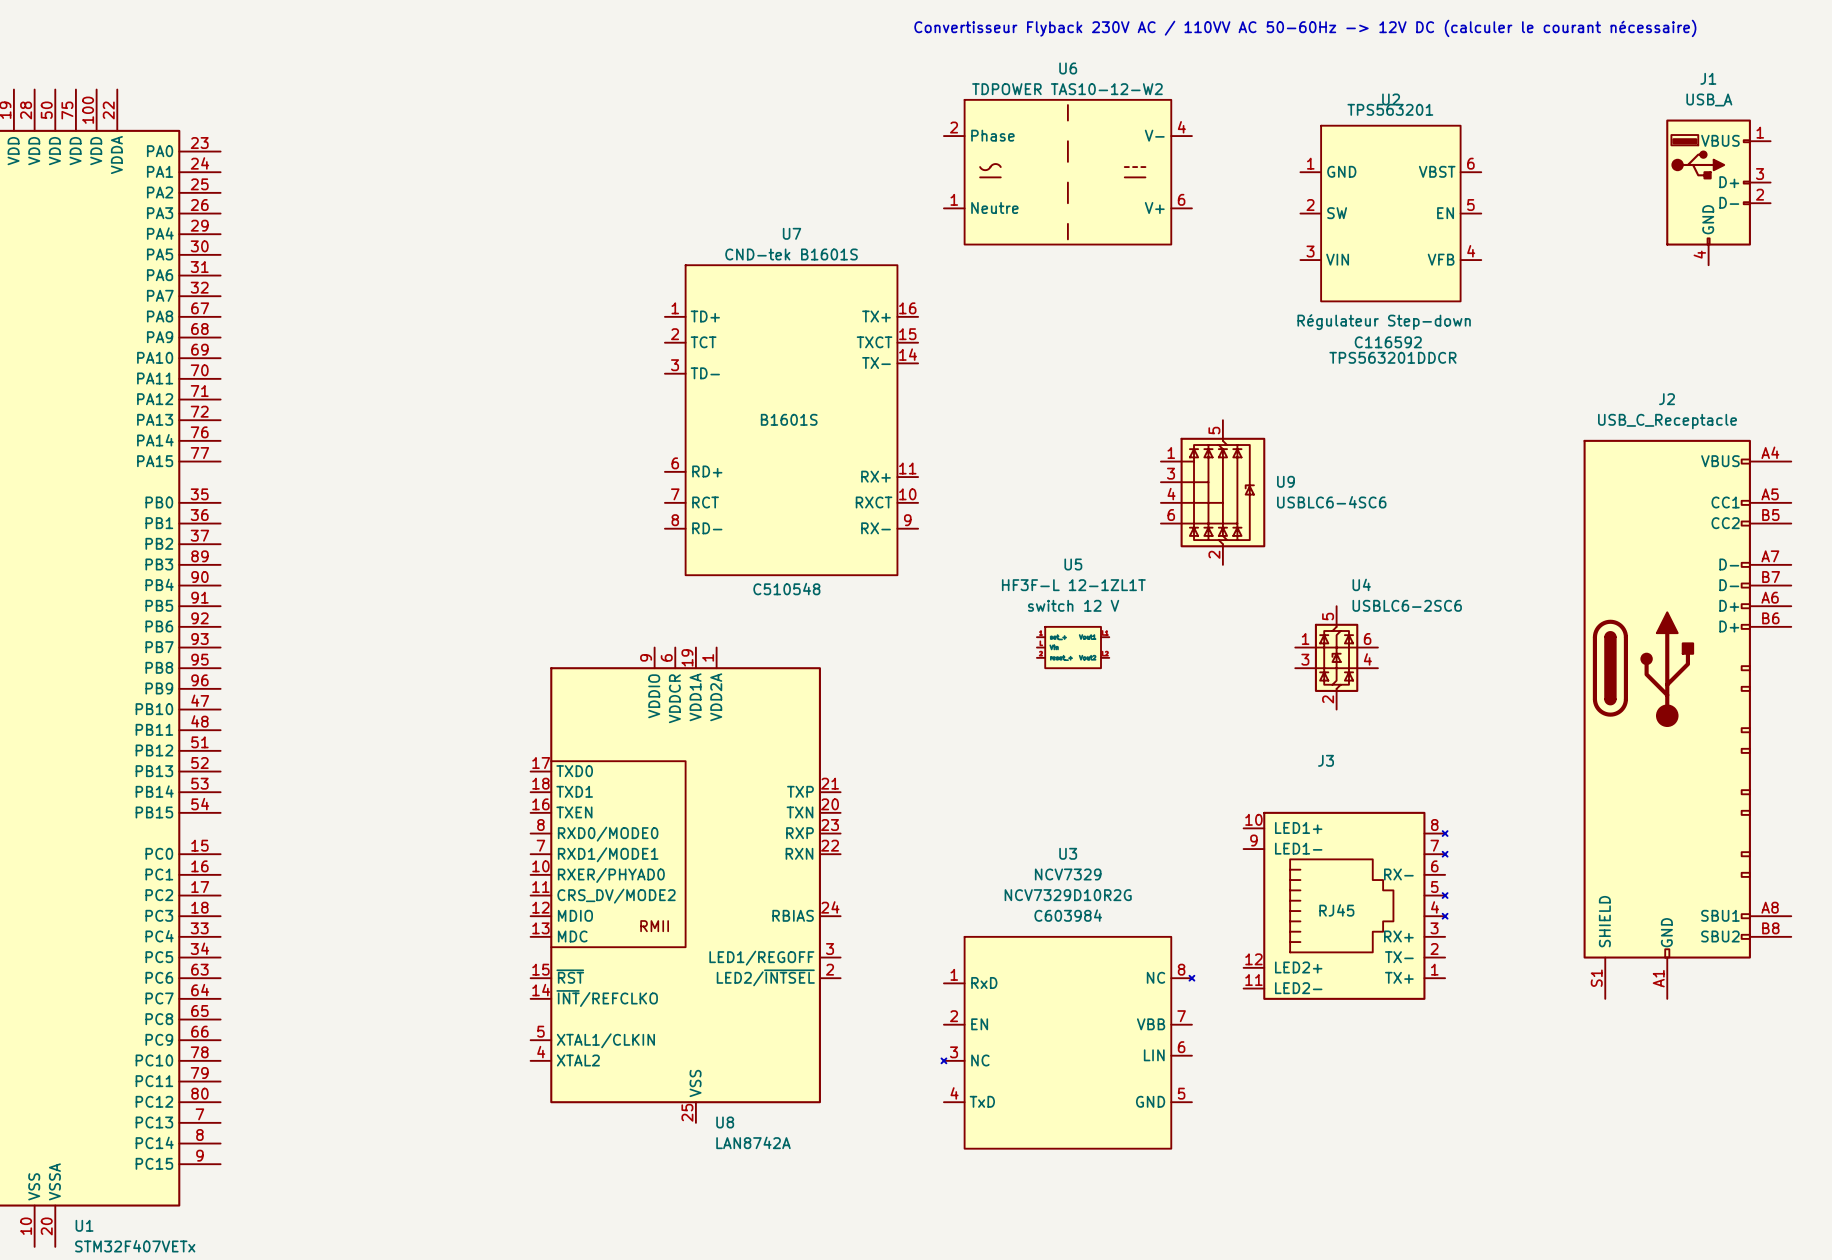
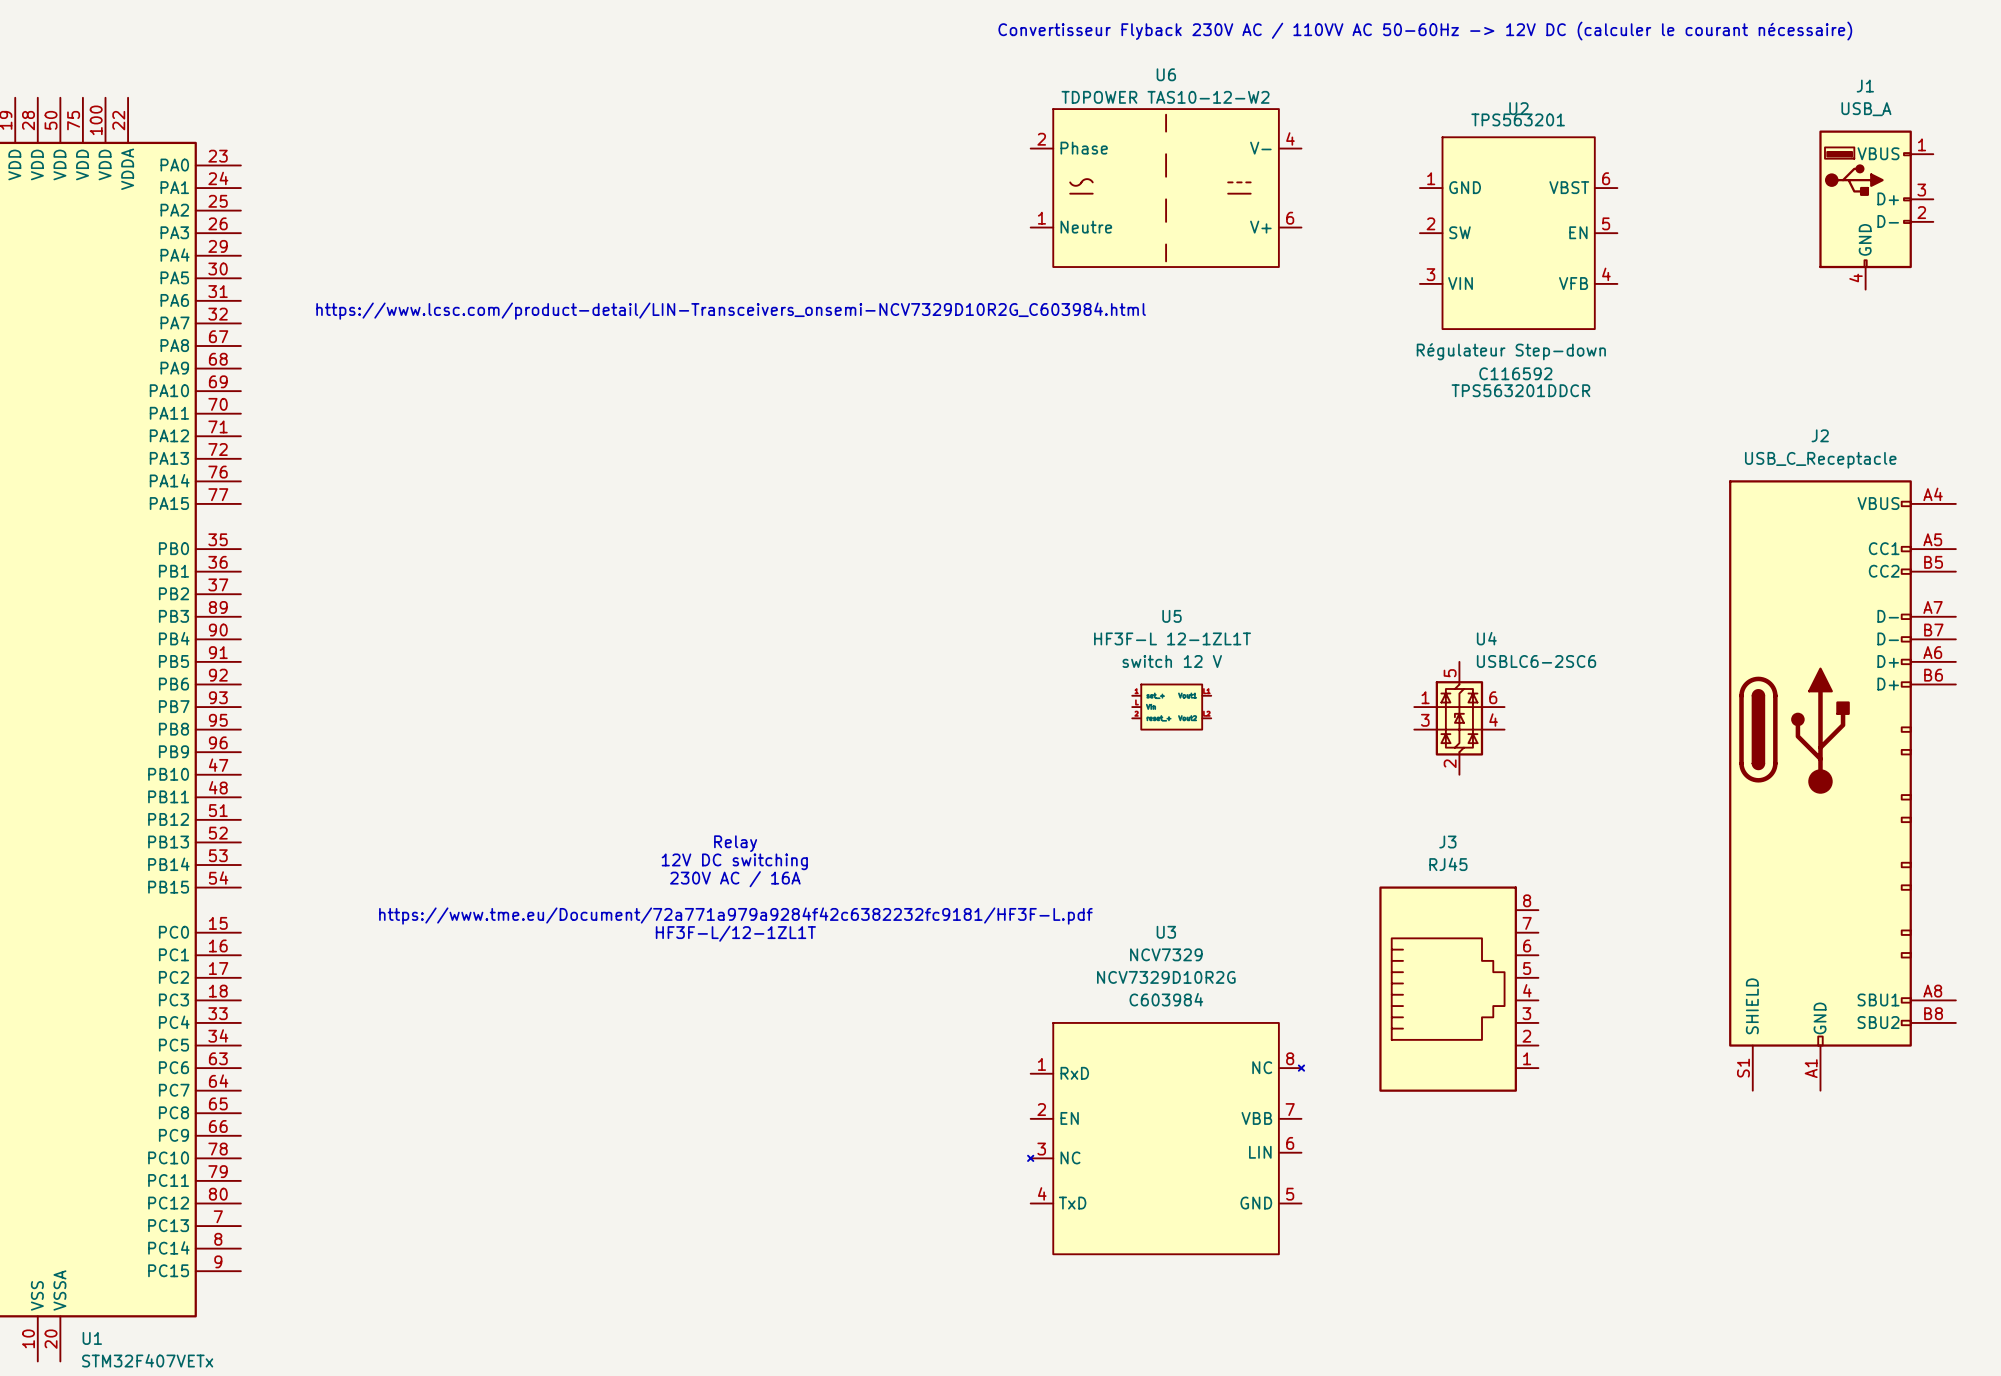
text: none -> https://www.lcsc.com/product-detail/LIN-Transceivers_onsemi-NCV7329D10R2G_C603984.html (731, 311)
U7: CND-tek B1601S (791, 420) -> none
U9: USBLC6-4SC6 (1213, 492) -> none
text: none -> Relay (735, 843)
text: none -> 12V DC switching (734, 861)
text: none -> 230V AC / 16A (735, 879)
J3 symbol: [1243, 811, 1448, 1000] -> [1379, 886, 1539, 1092]
text: none -> https://www.tme.eu/Document/72a771a979a9284f42c6382232fc9181/HF3F-L.pdf (735, 916)
text: none -> HF3F-L/12-1ZL1T (735, 933)
U8: LAN8742A (685, 885) -> none
J3 value position: RJ45 (1336, 910) -> RJ45 (1448, 864)

